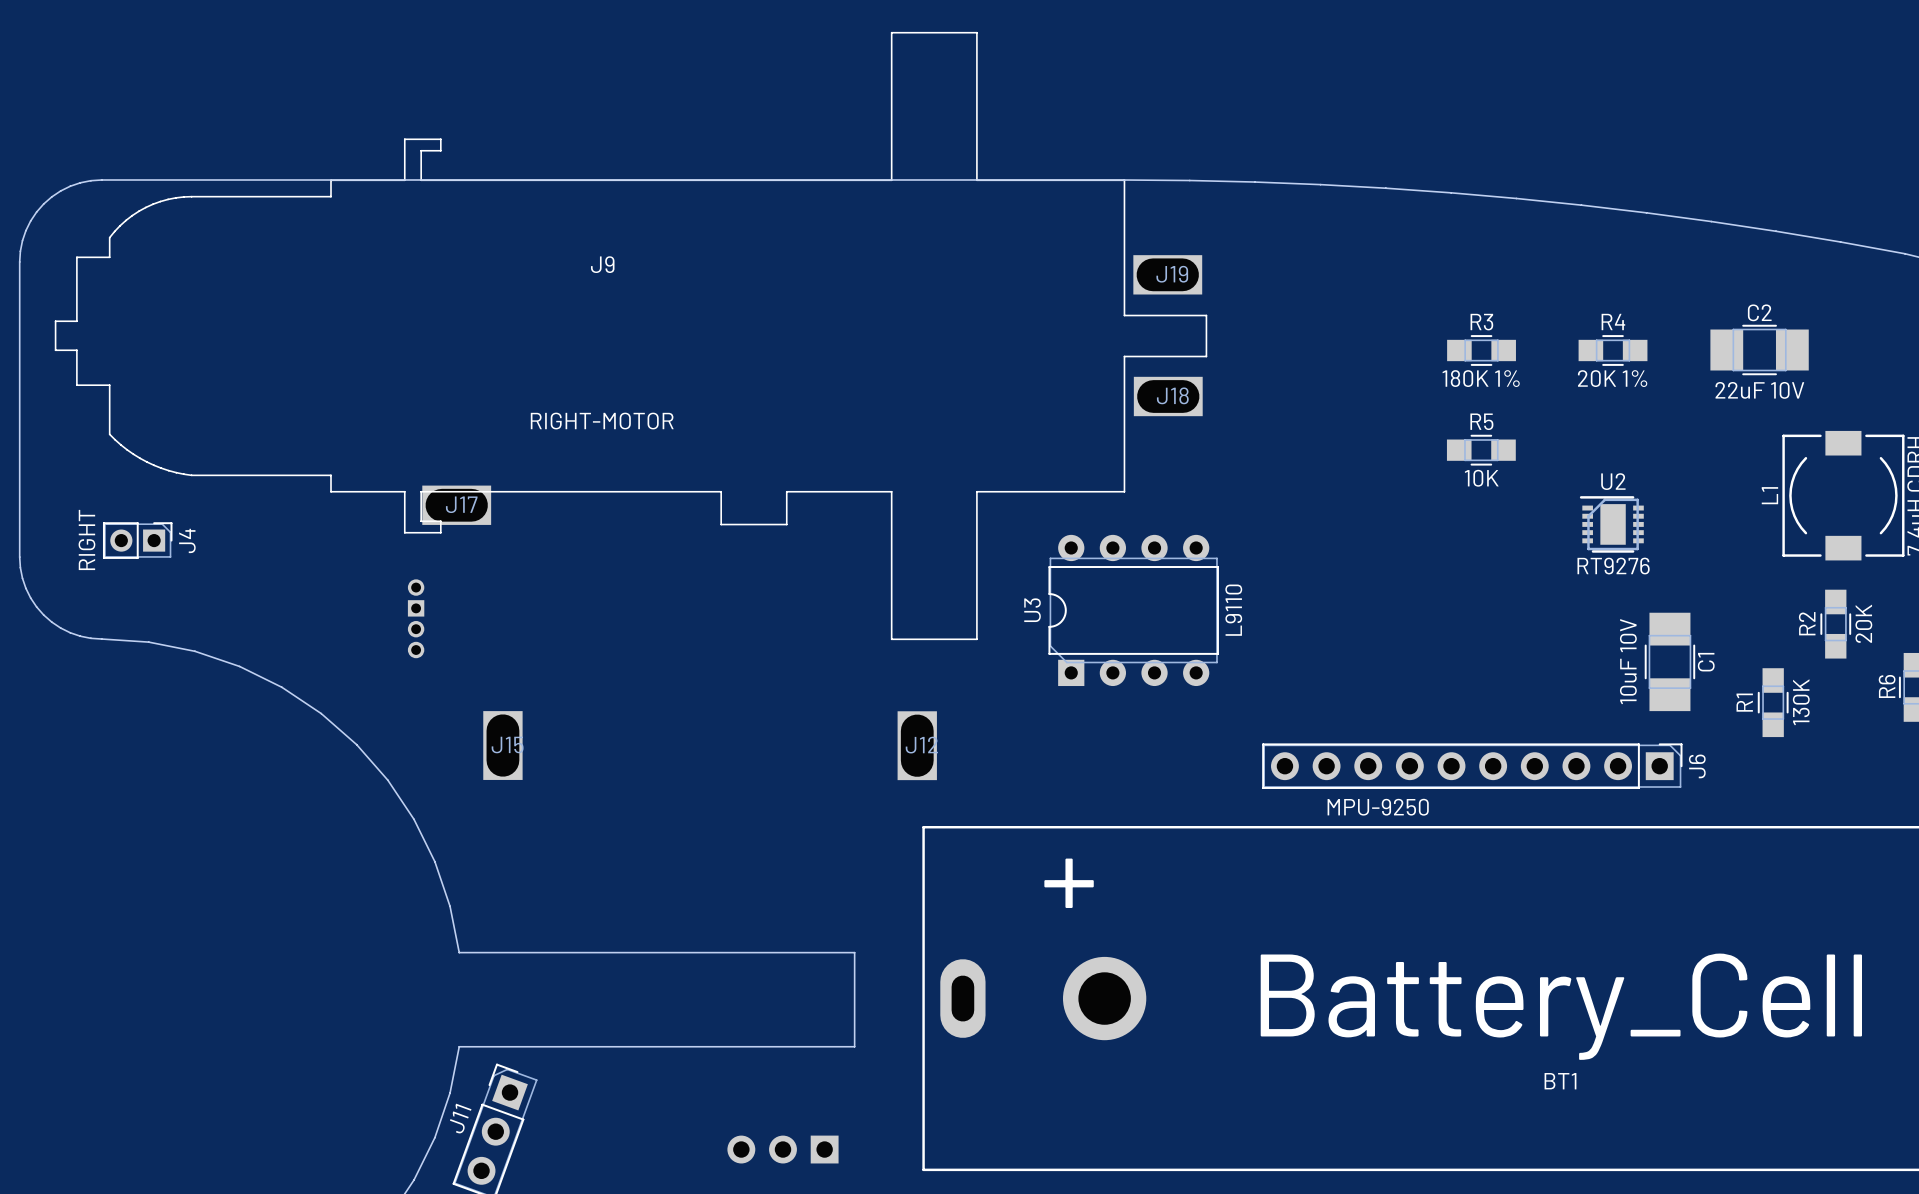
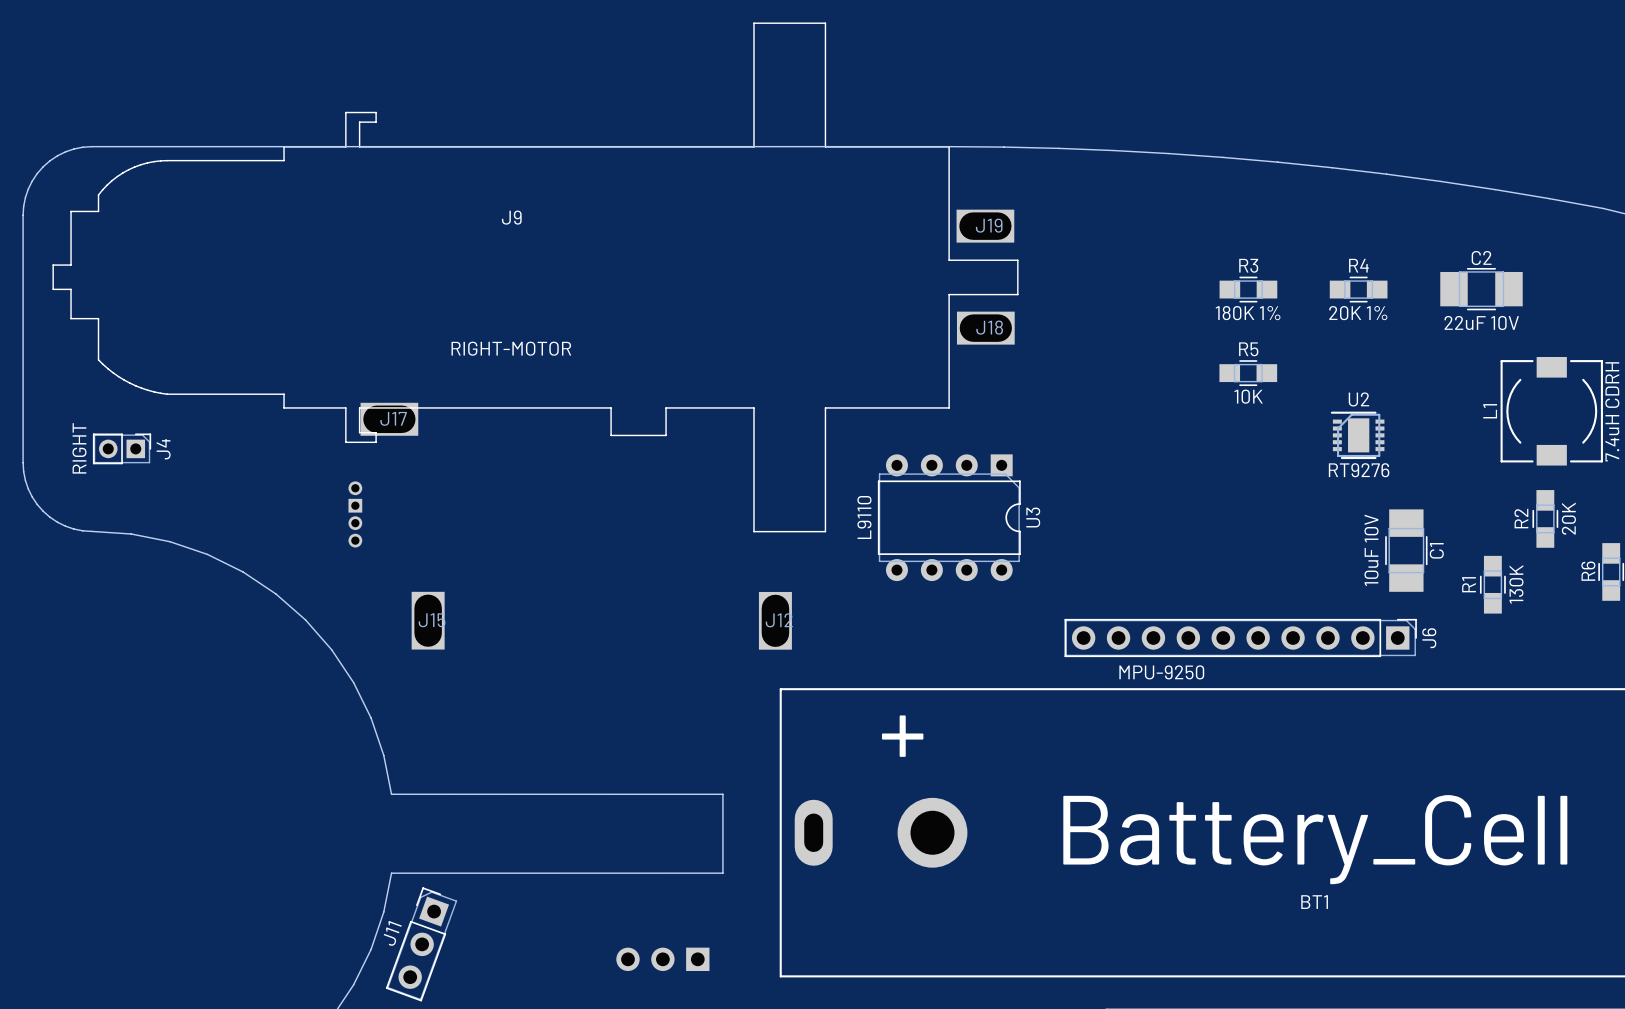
U3 rotation: 0° (1133, 610) -> 180° (949, 517)

